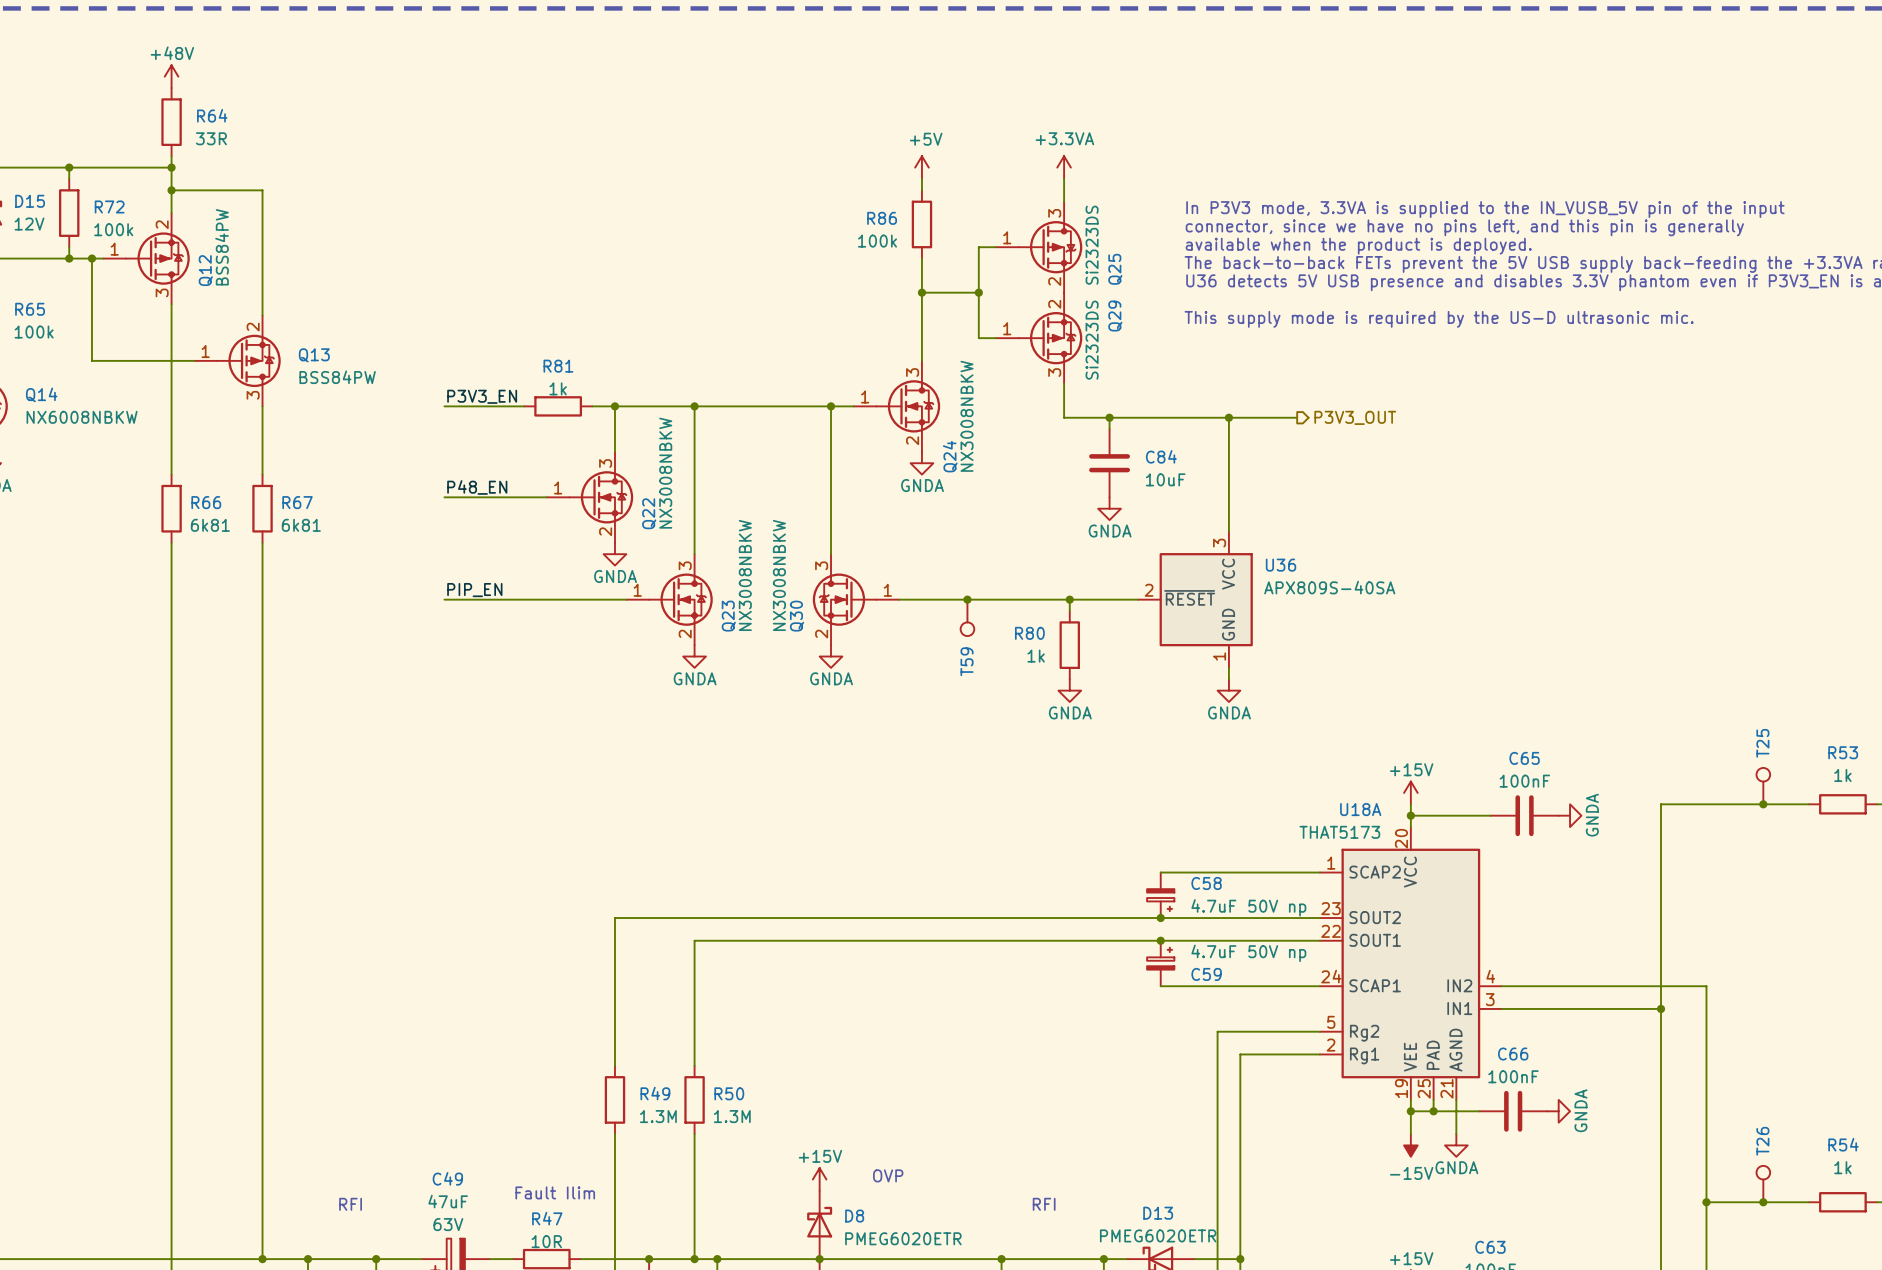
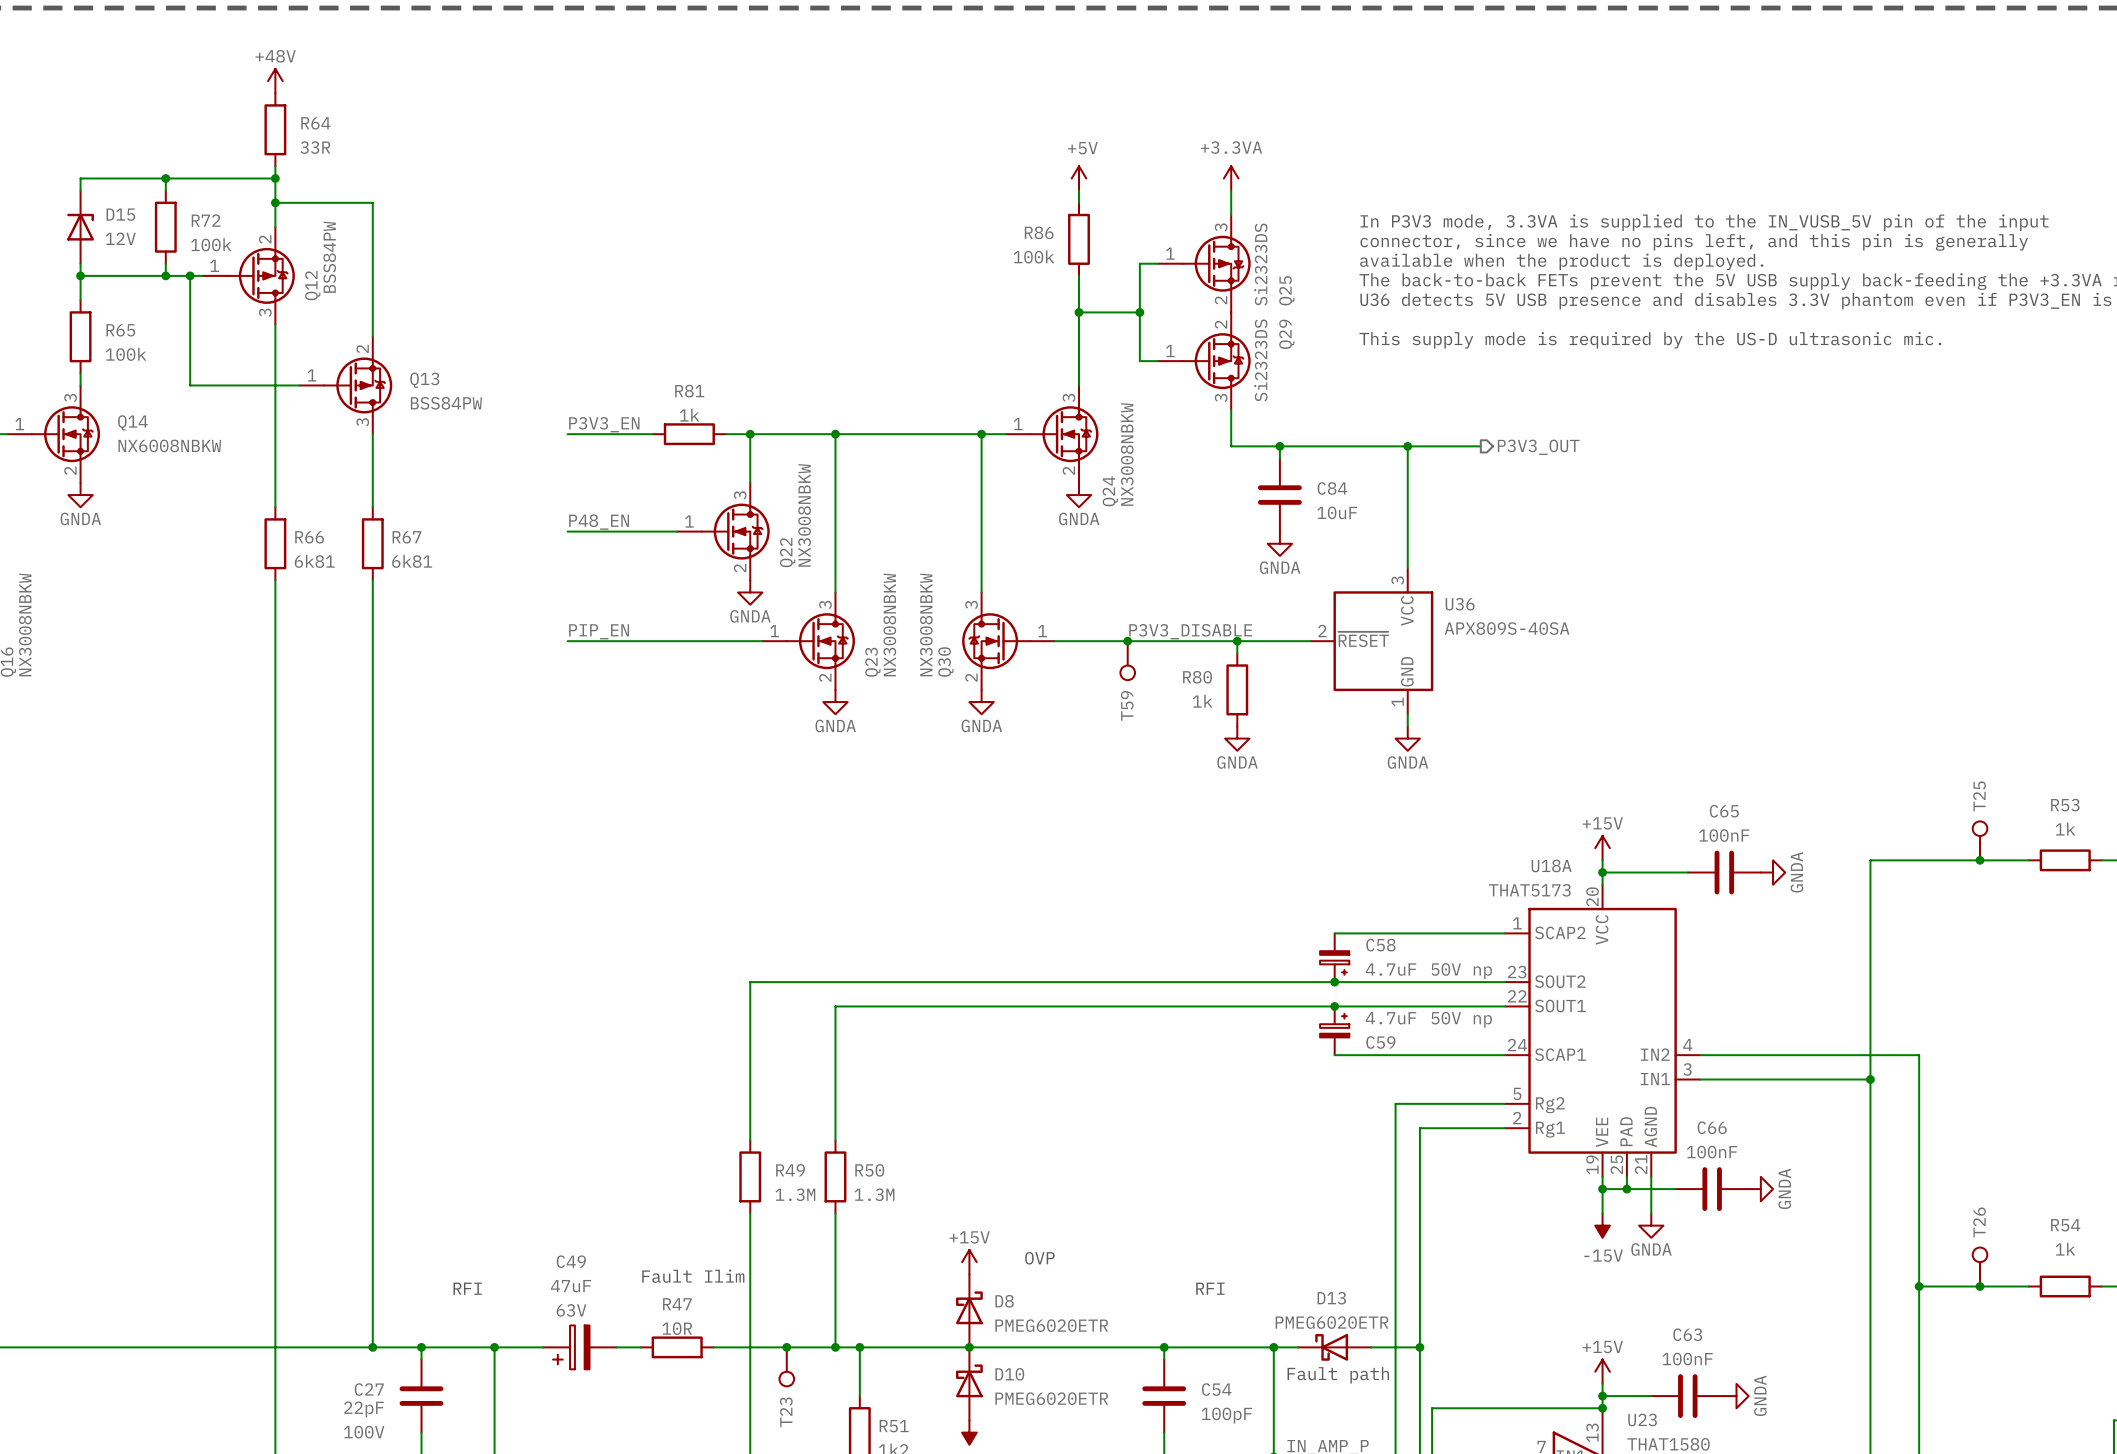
label: none -> P3V3_DISABLE (1190, 631)

